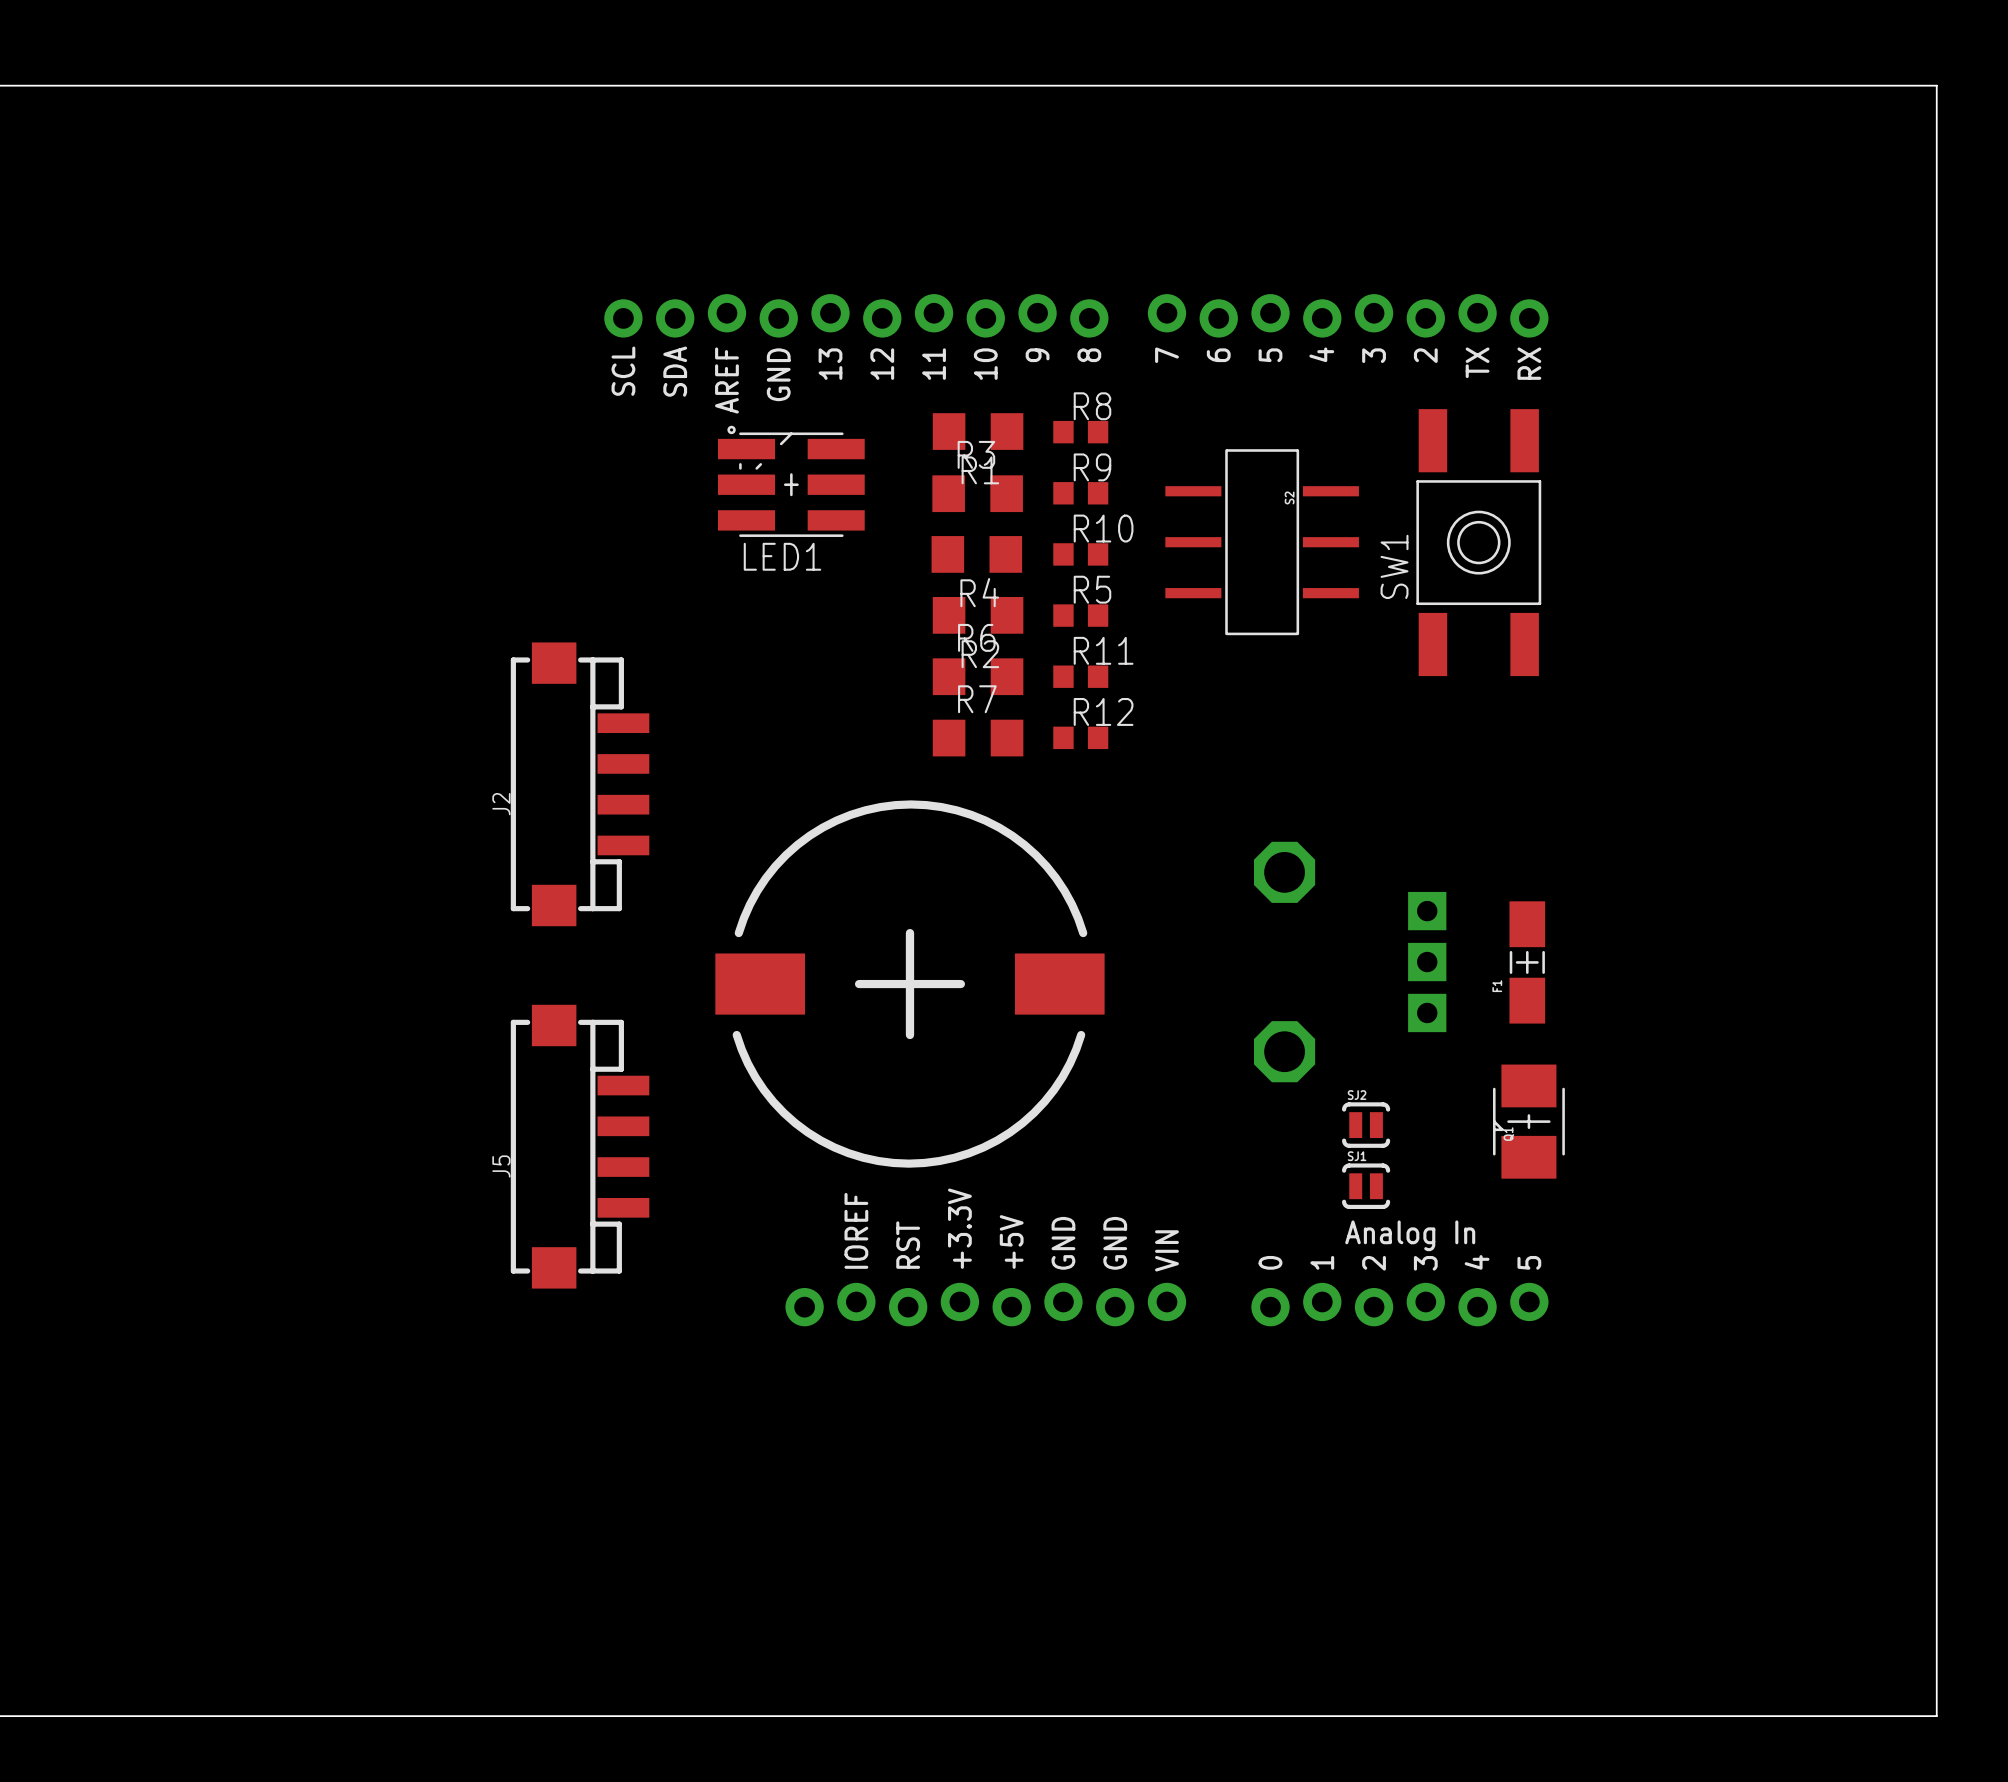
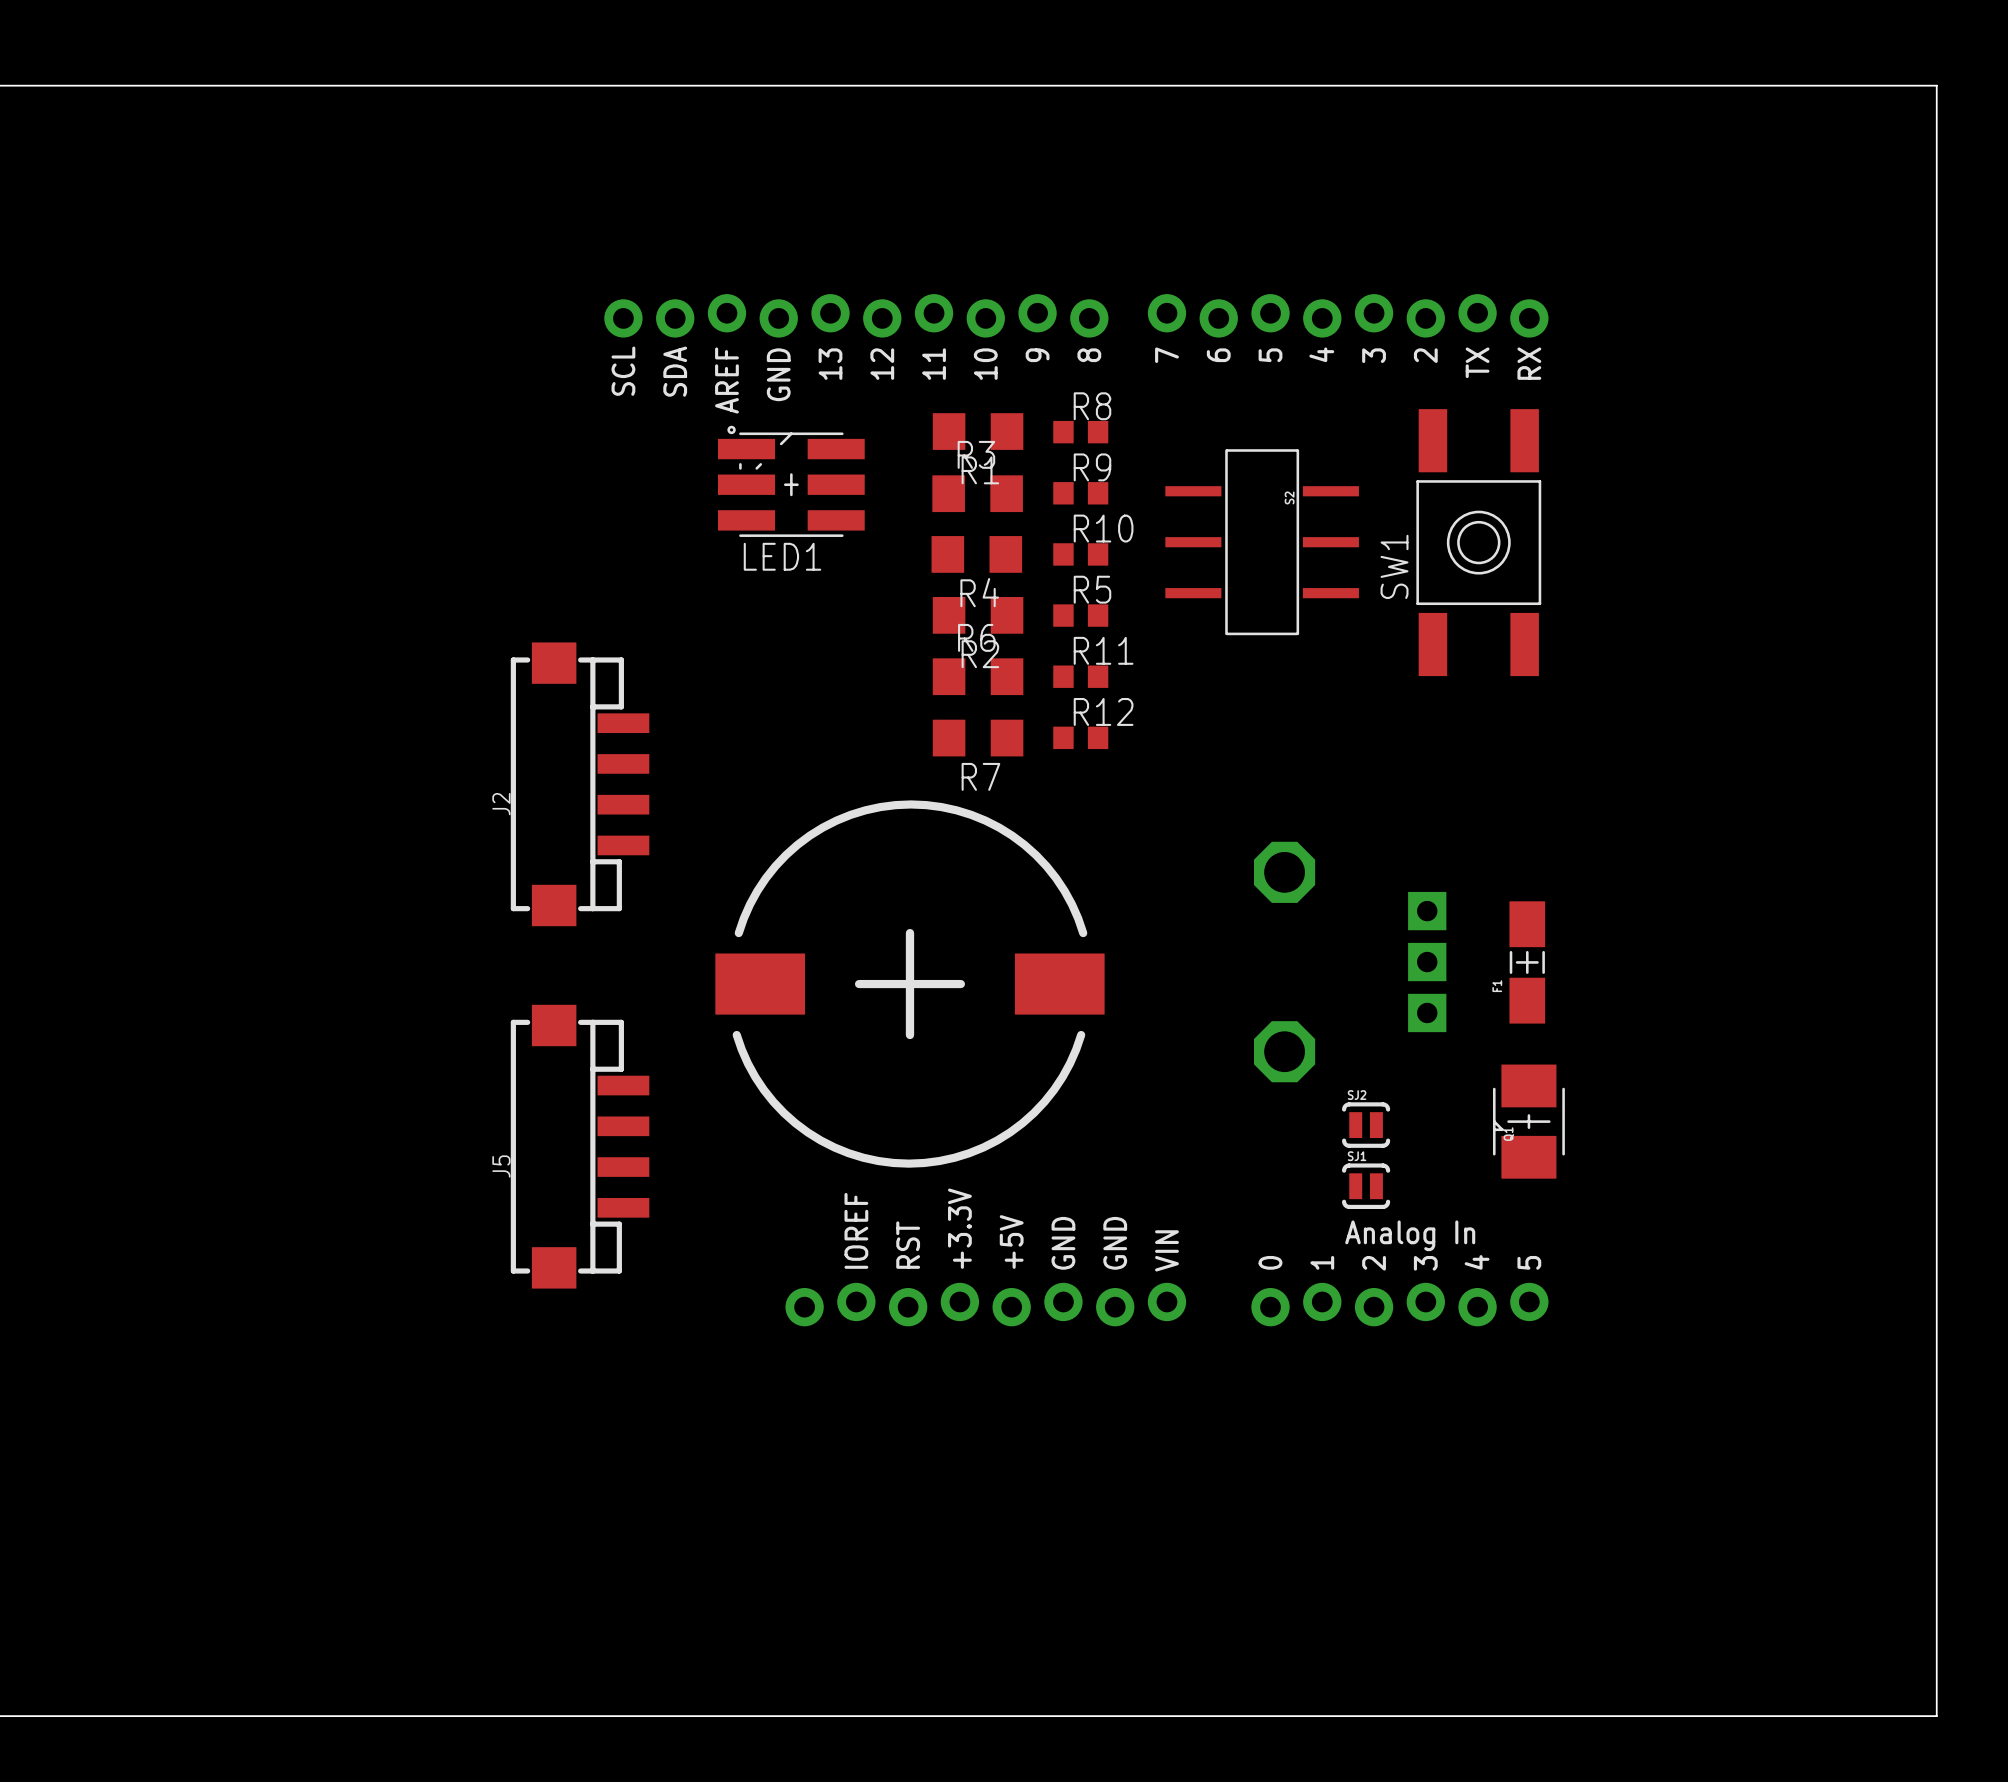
R7 name position: R7 (977, 699) -> R7 (980, 776)

